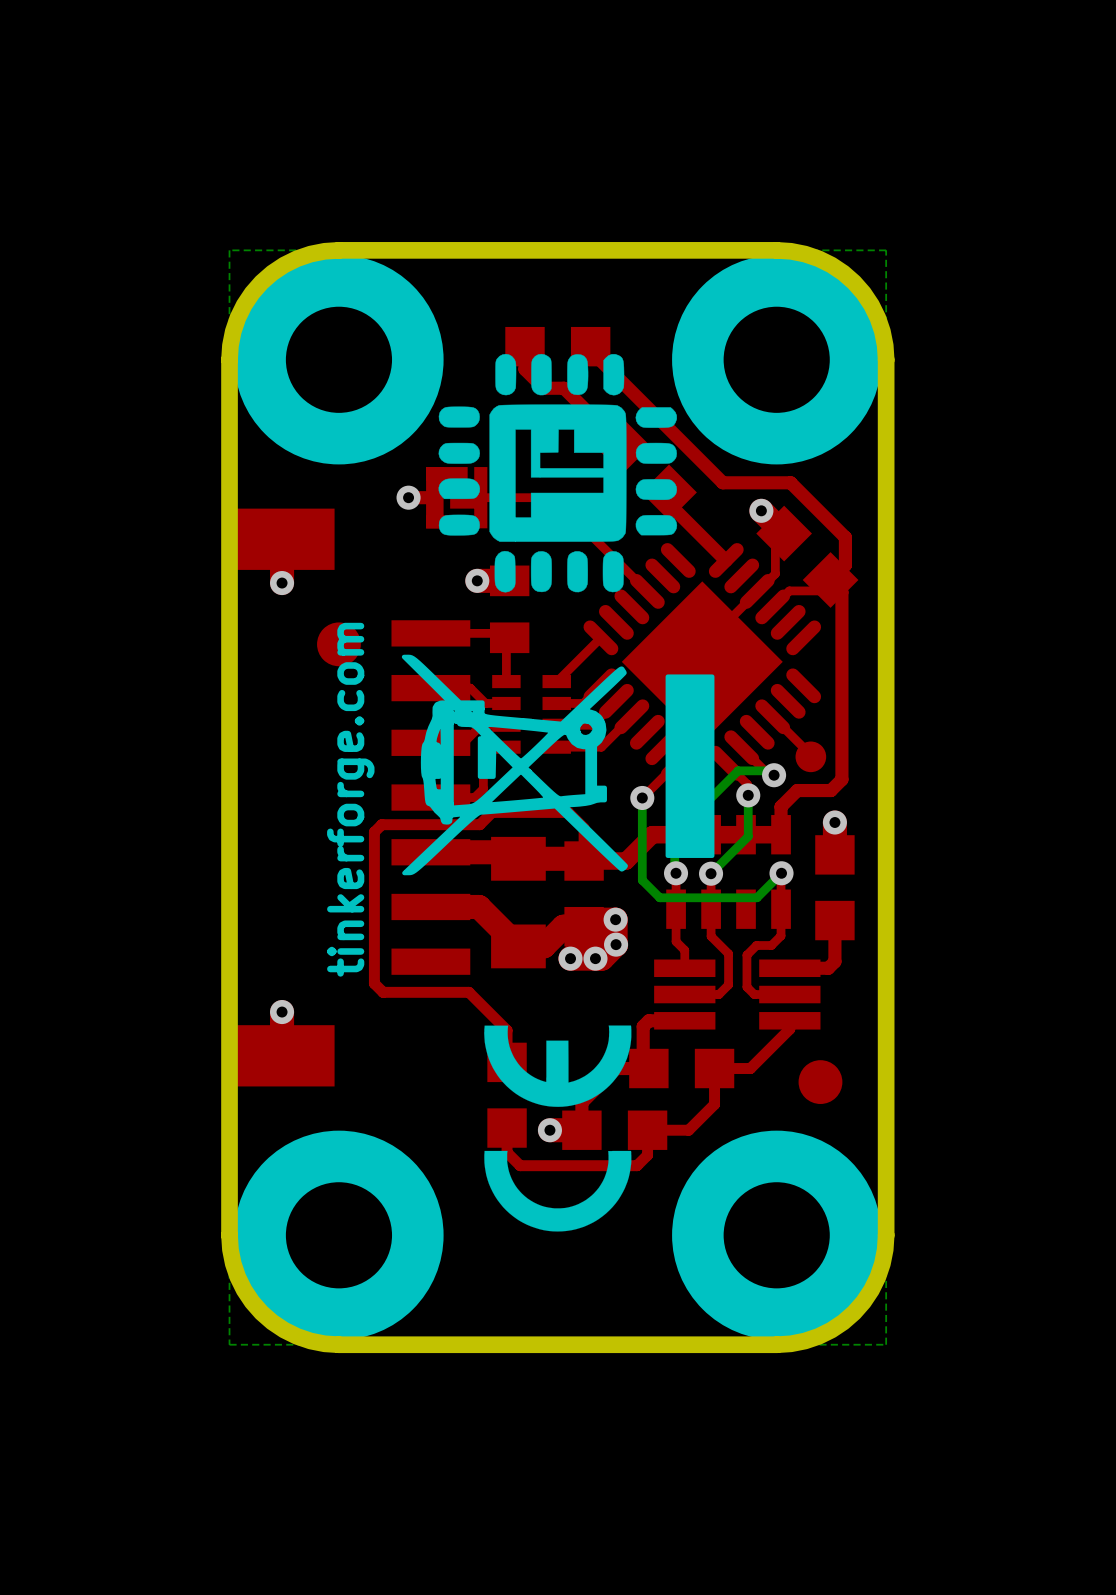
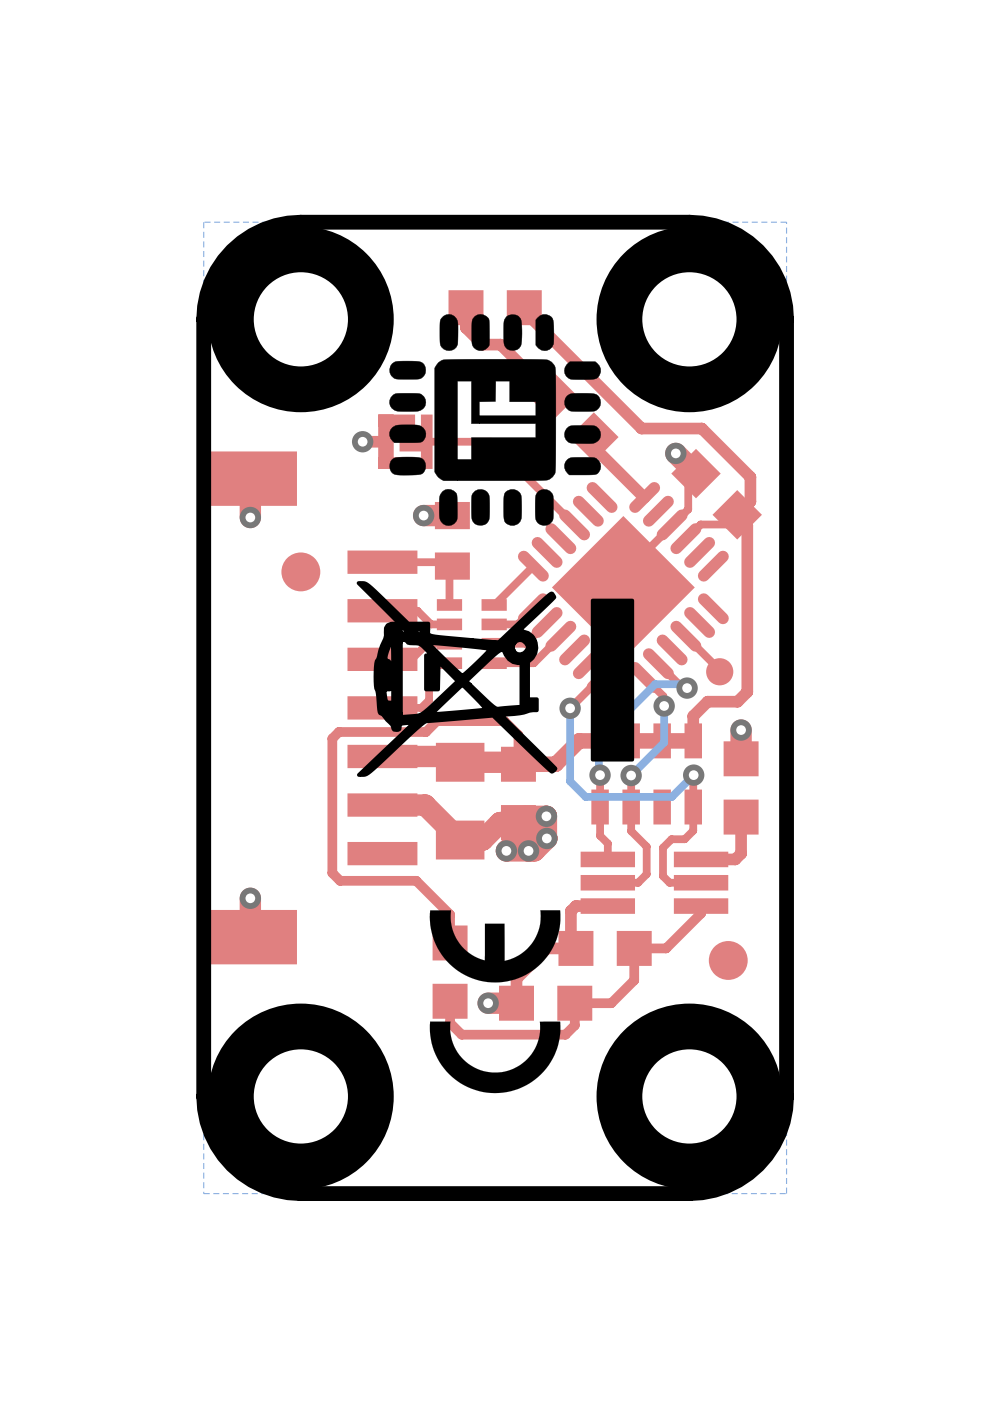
text: tinkerforge.com (350, 799) -> none

